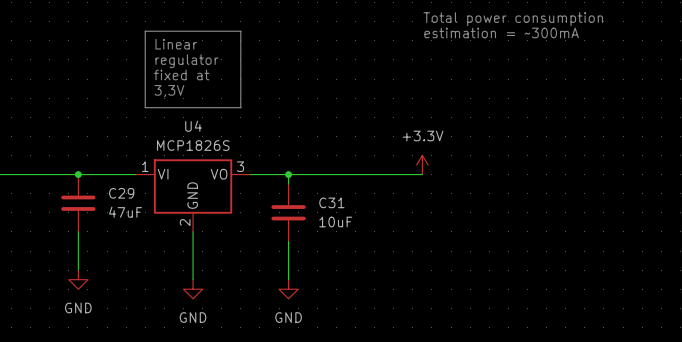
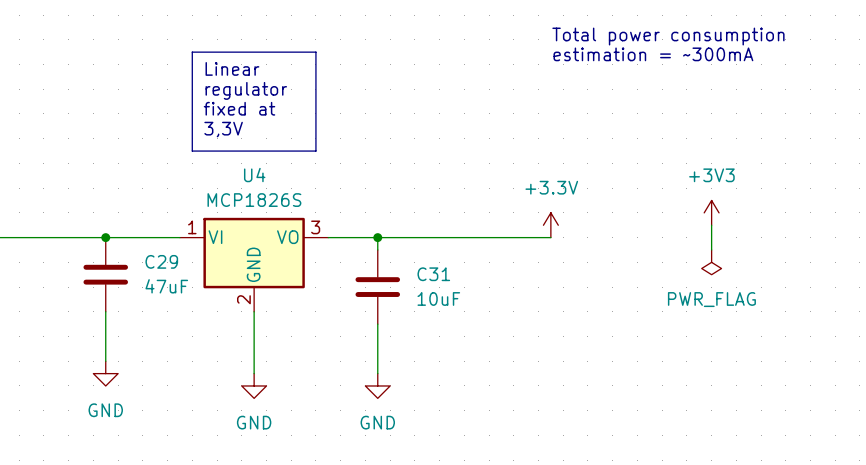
power symbol: none -> +3V3 (711, 212)
wire: none -> (711, 225) (711, 249)
power symbol: none -> PWR_FLAG (711, 262)

